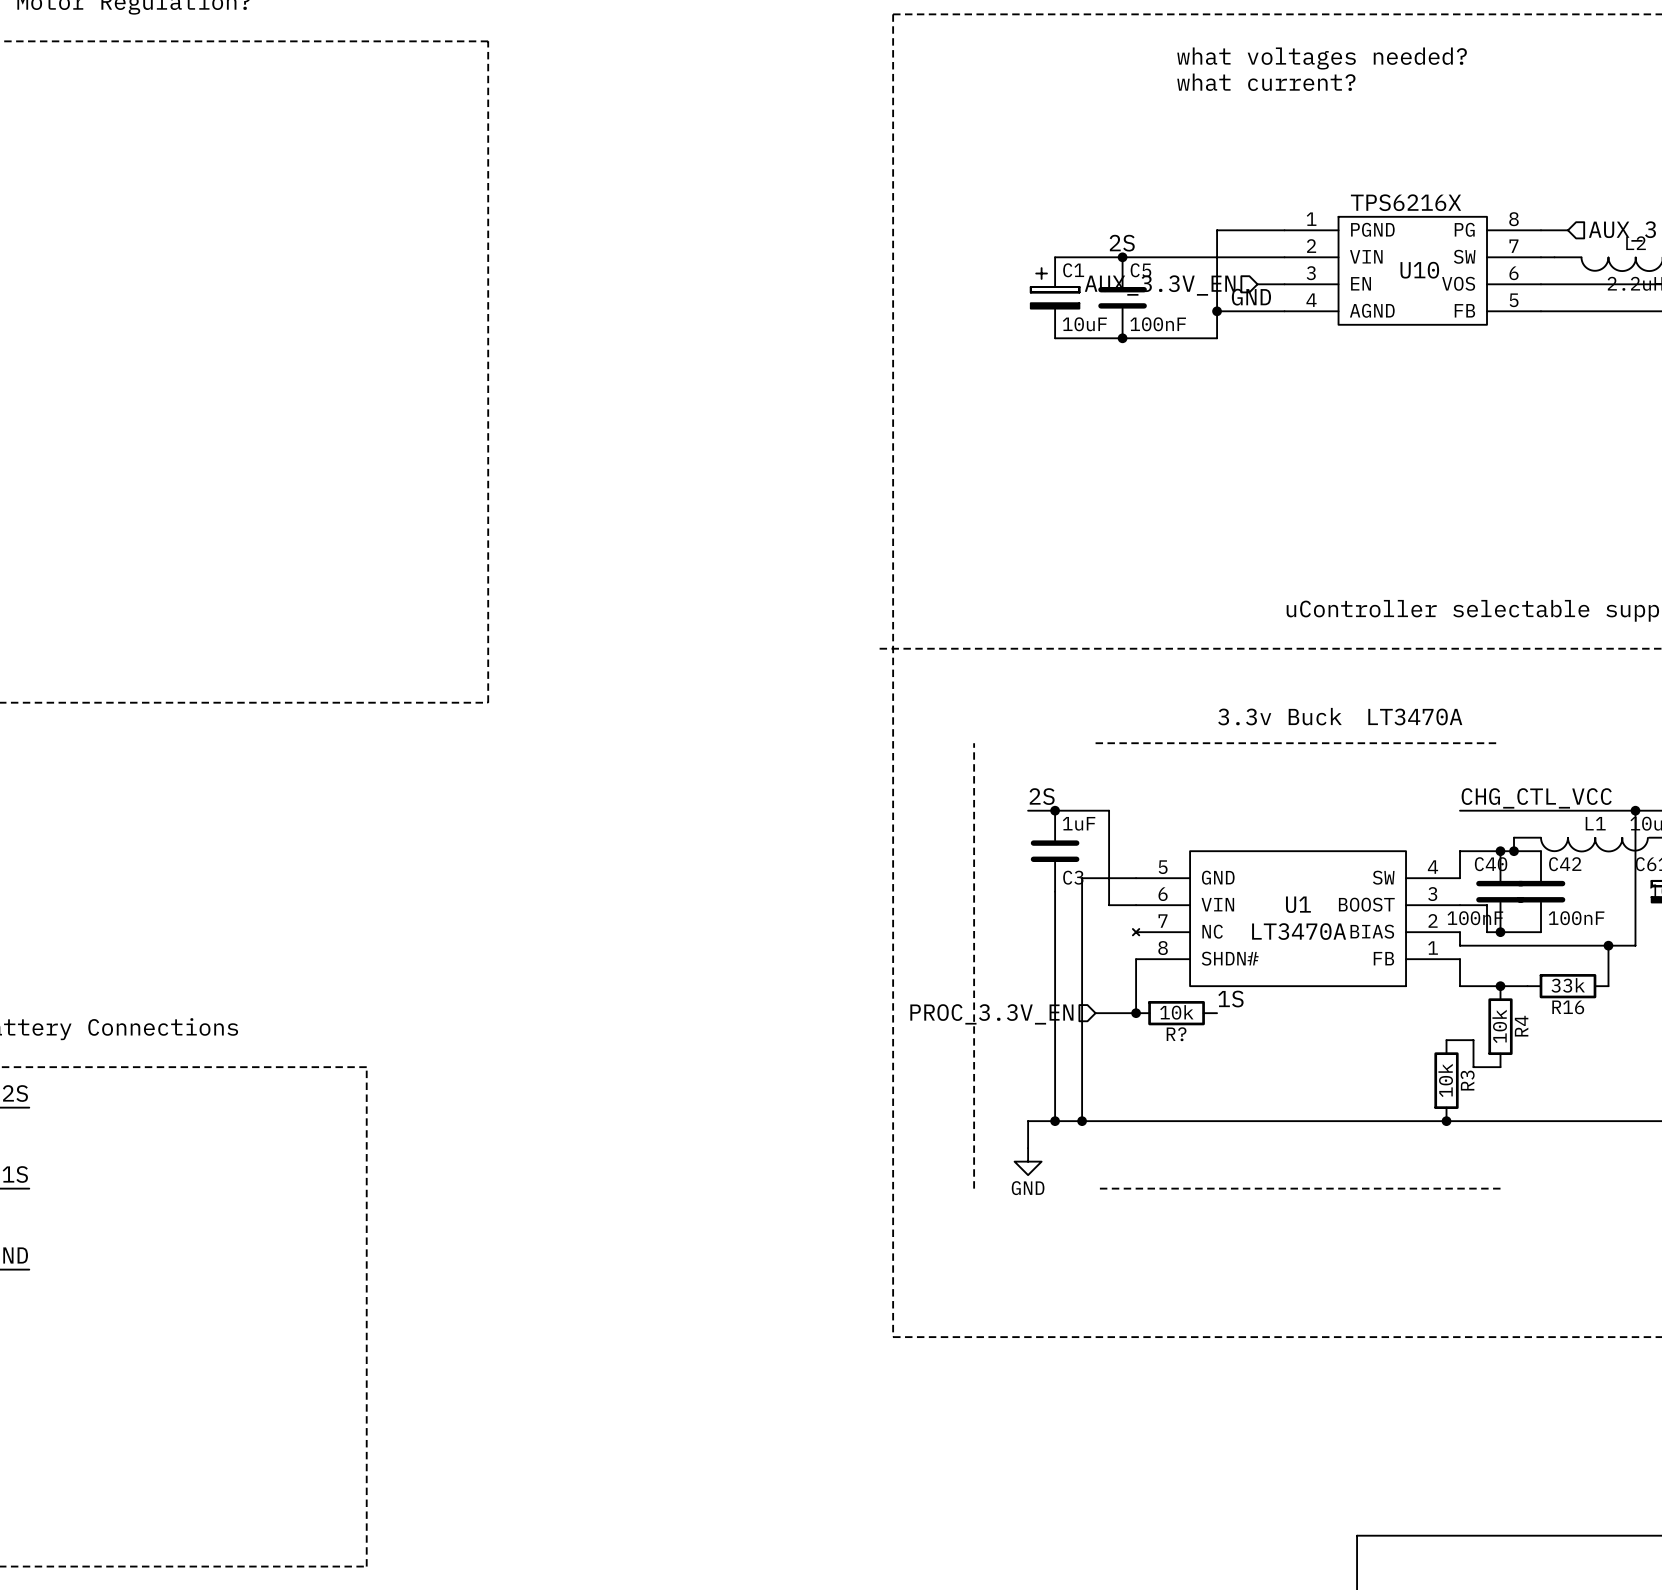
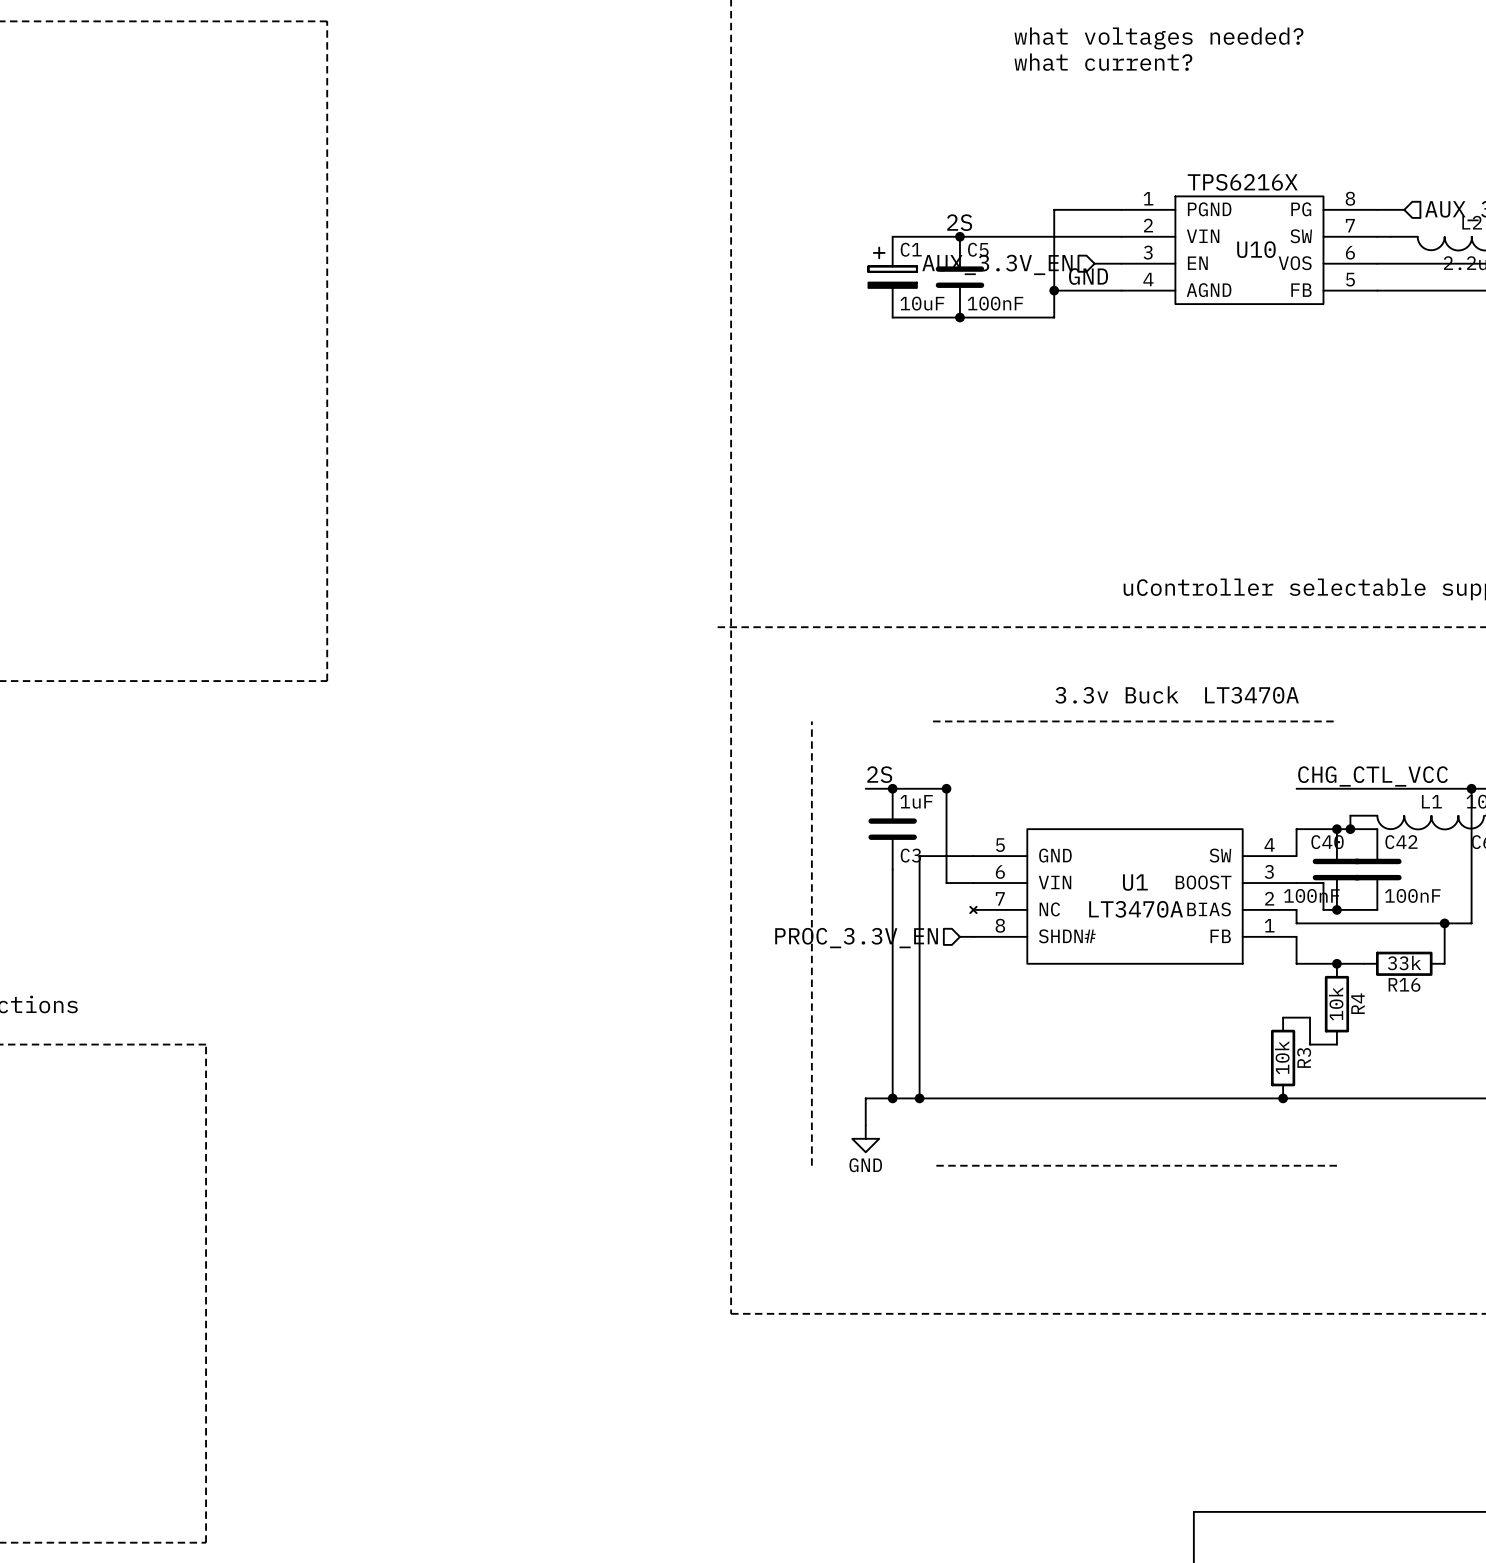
junction: none -> (946, 788)
wire: (1136, 959) (1136, 1013) (1095, 1013) -> (973, 936) (959, 936)
label: 1S (1230, 999) -> none
junction: (1136, 1013) -> none
R?: 10k (1176, 1013) -> none
hierarchical label position: PROC_3.3V_EN (991, 1014) -> PROC_3.3V_EN (856, 938)

